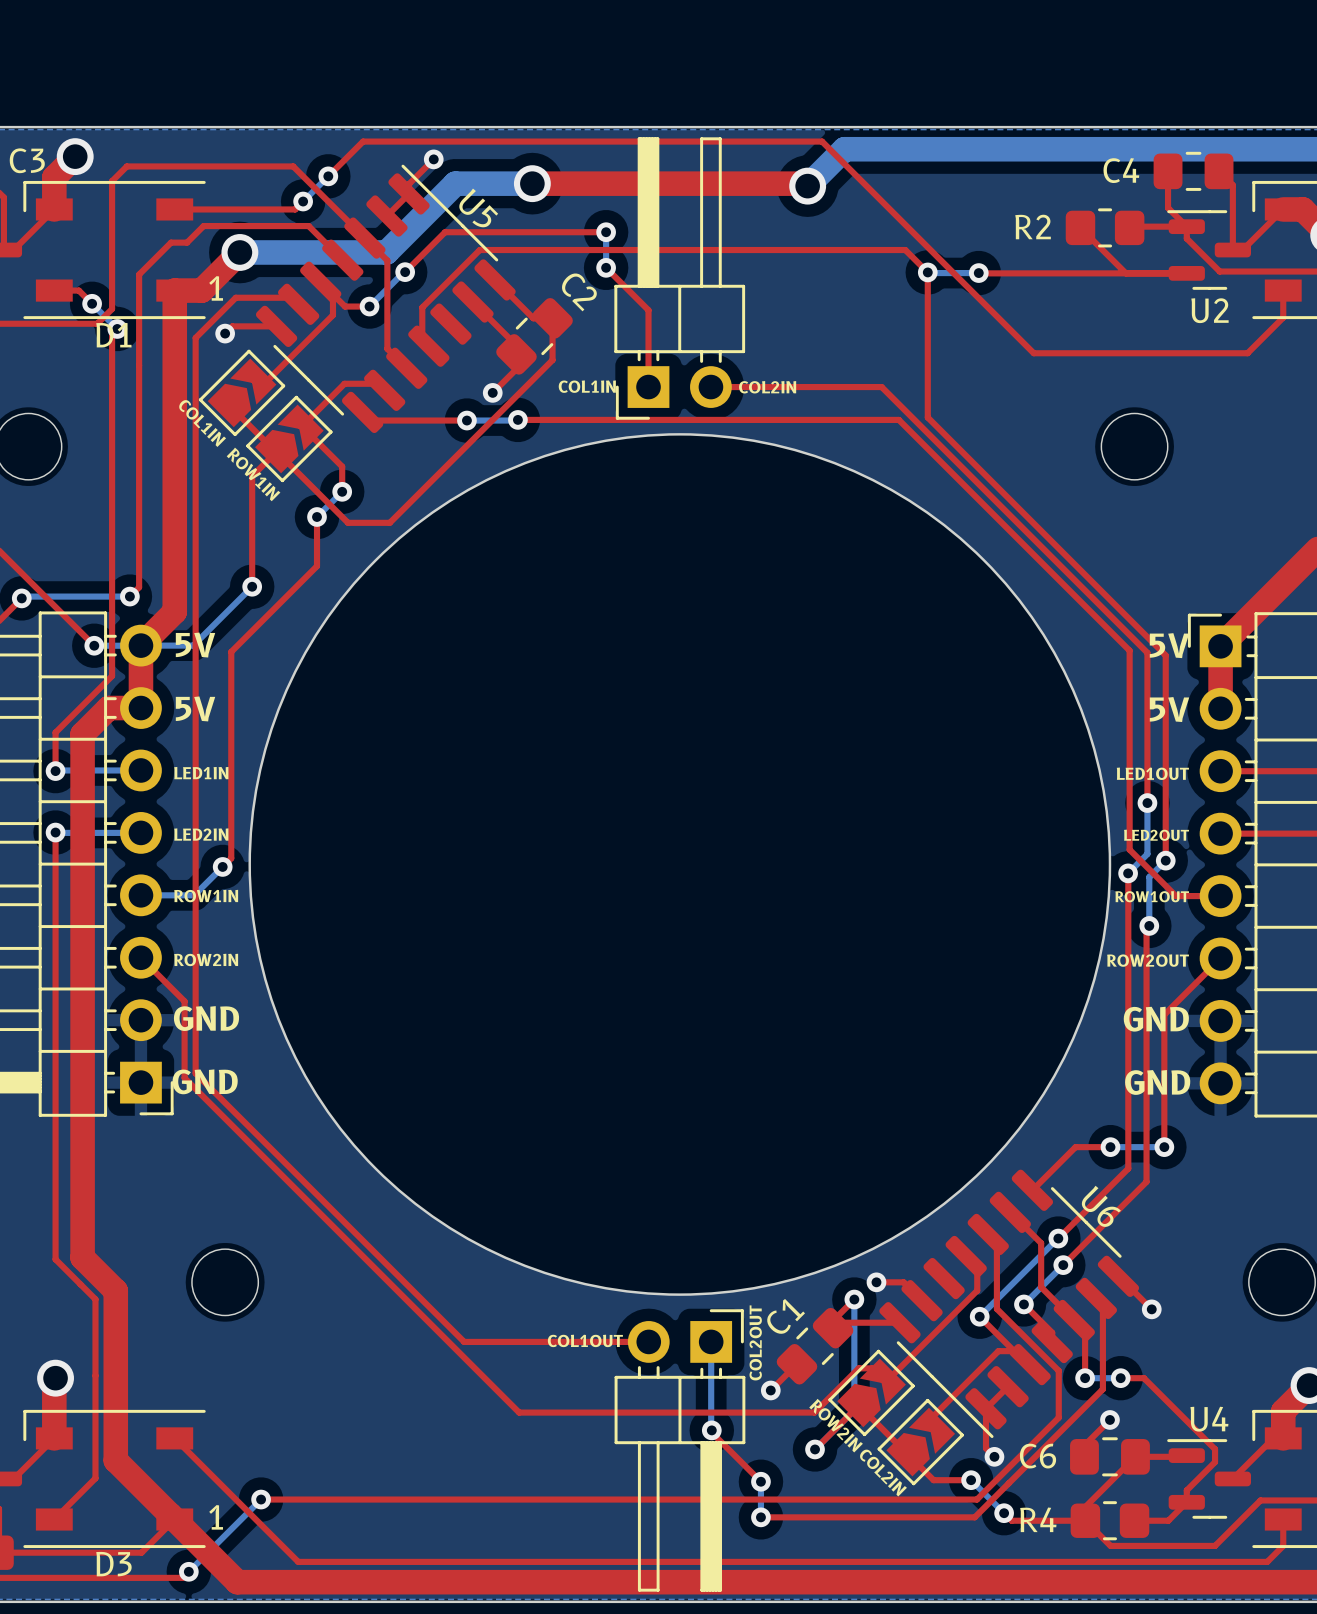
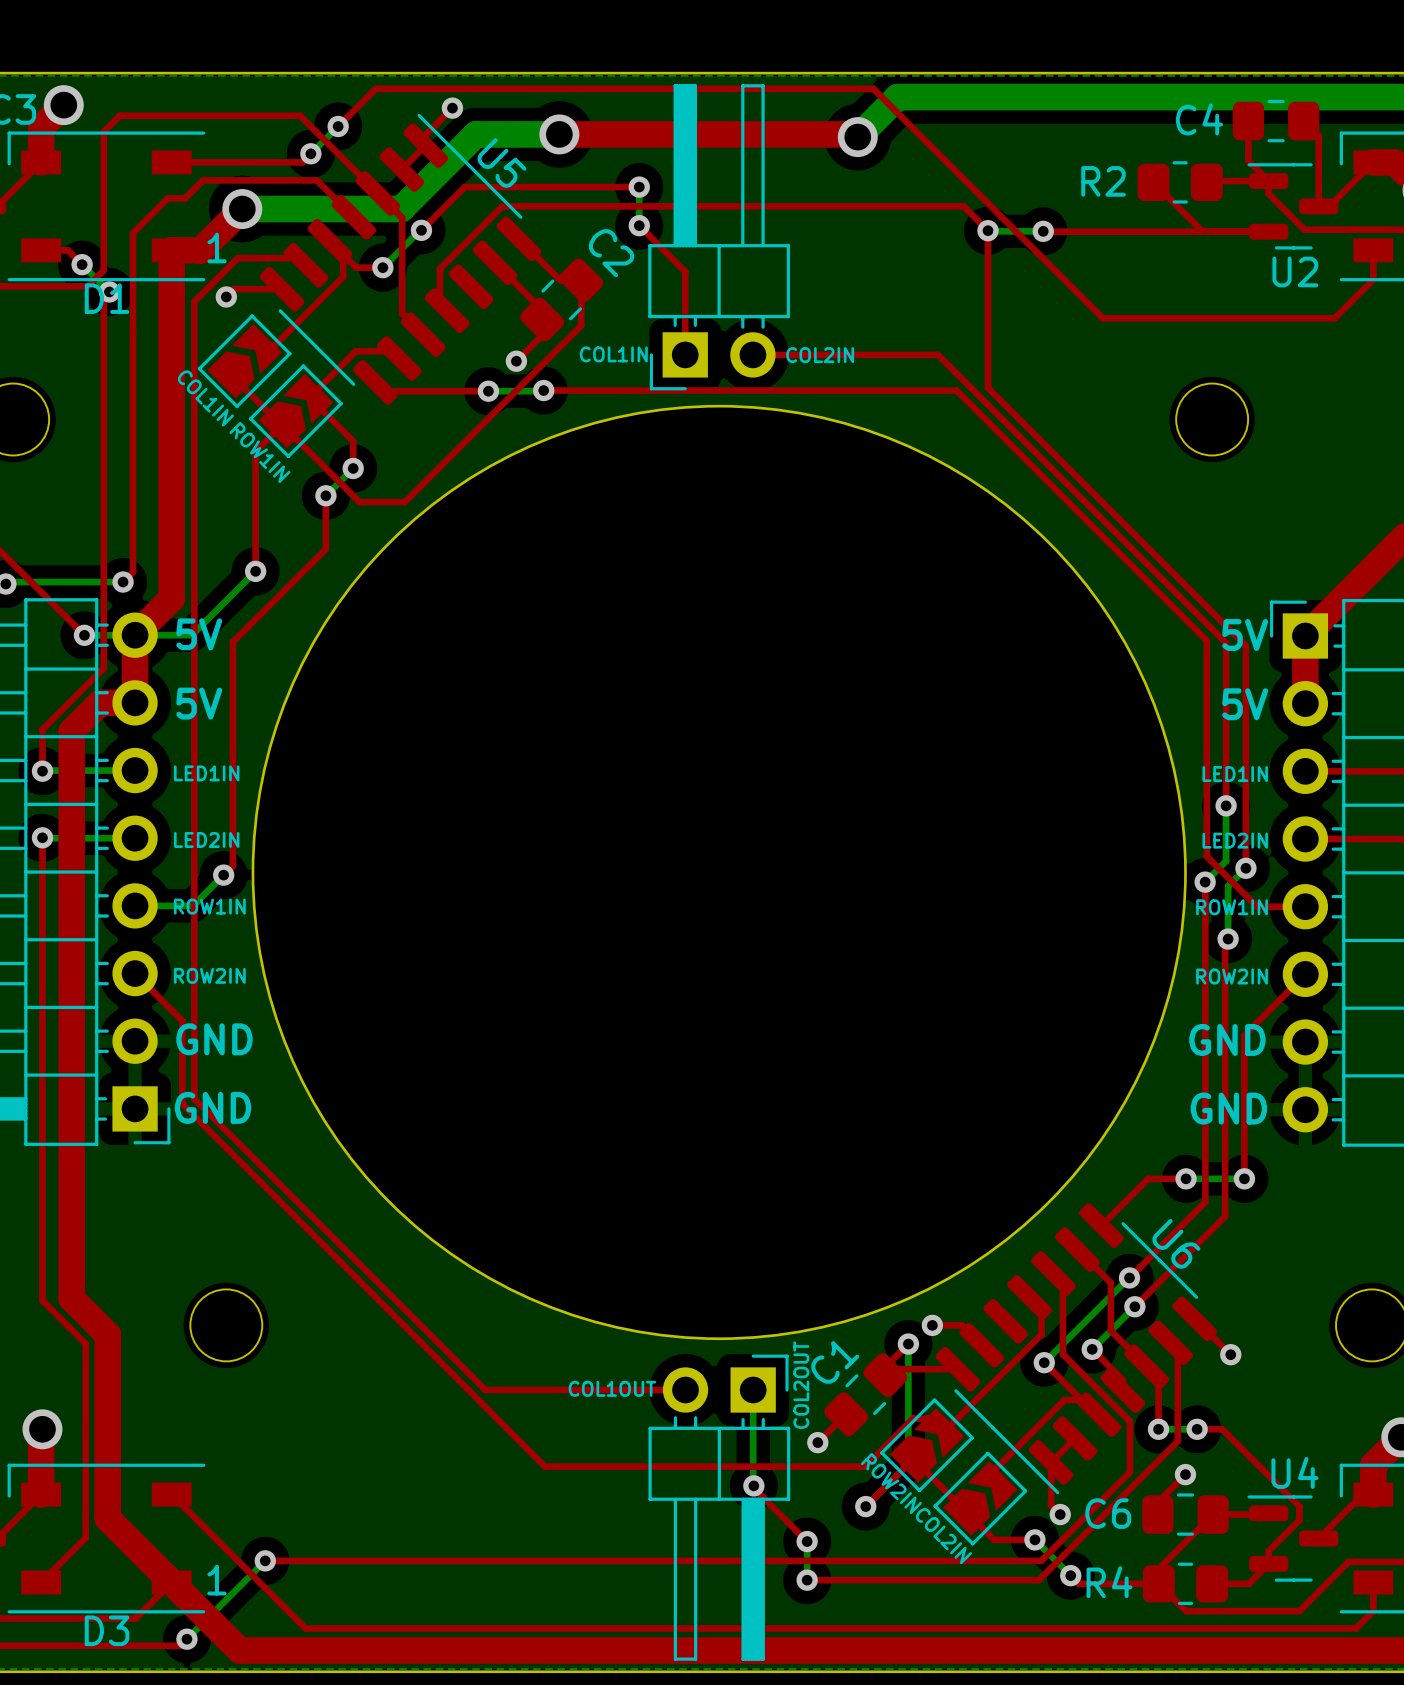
text: LED1OUT (1152, 773) -> LED1IN (1235, 774)
text: LED2OUT (1156, 835) -> LED2IN (1235, 840)
text: ROW1OUT (1152, 896) -> ROW1IN (1232, 907)
text: ROW2OUT (1148, 960) -> ROW2IN (1232, 976)

